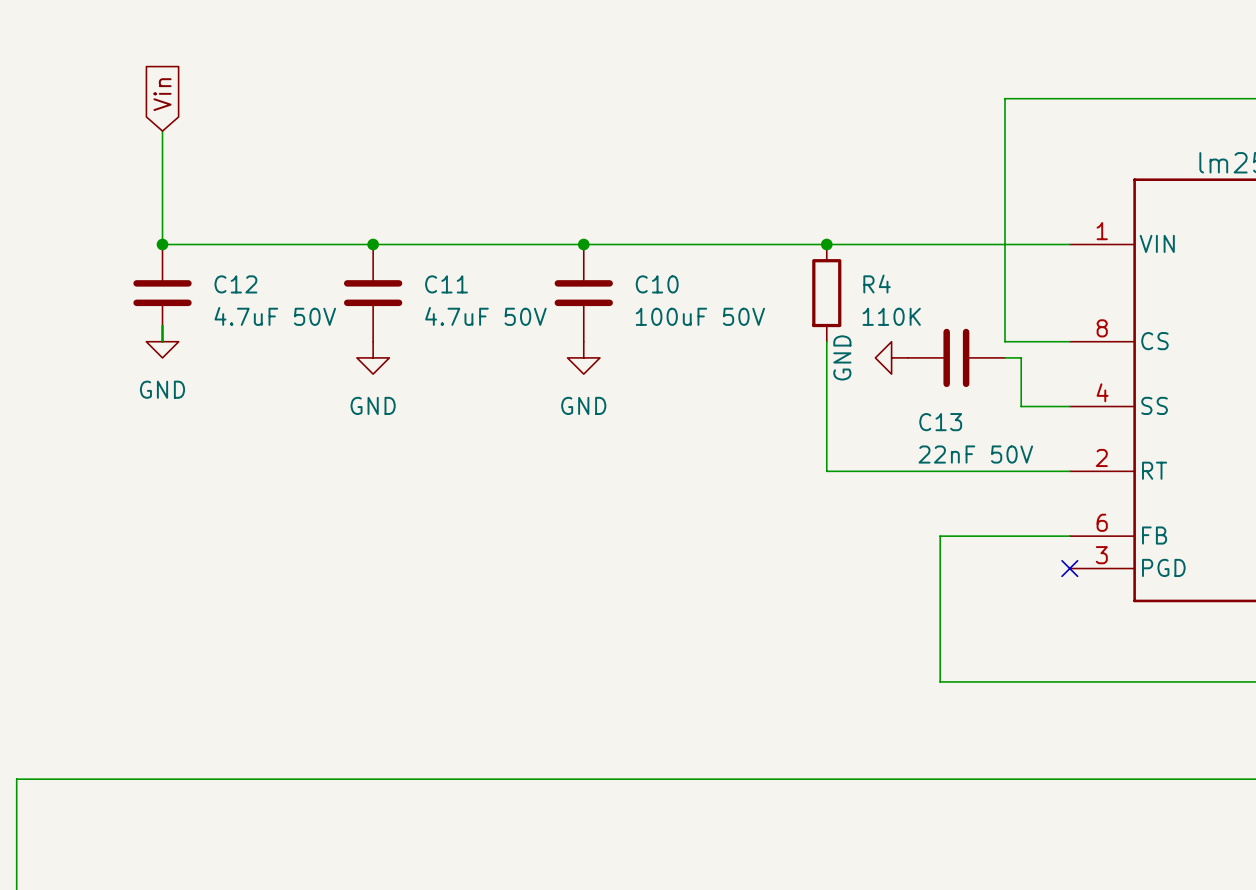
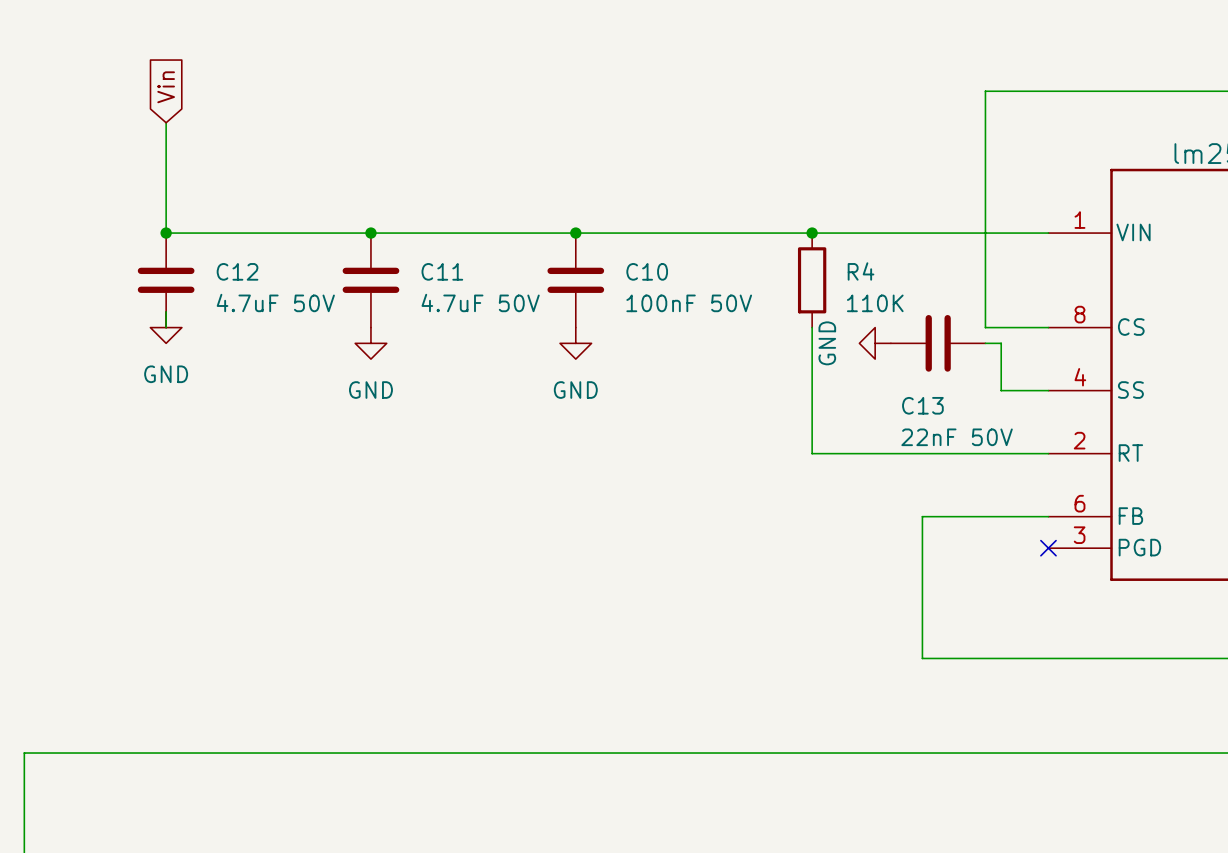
C10 value: 100uF 50V (700, 316) -> 100nF 50V (689, 303)

